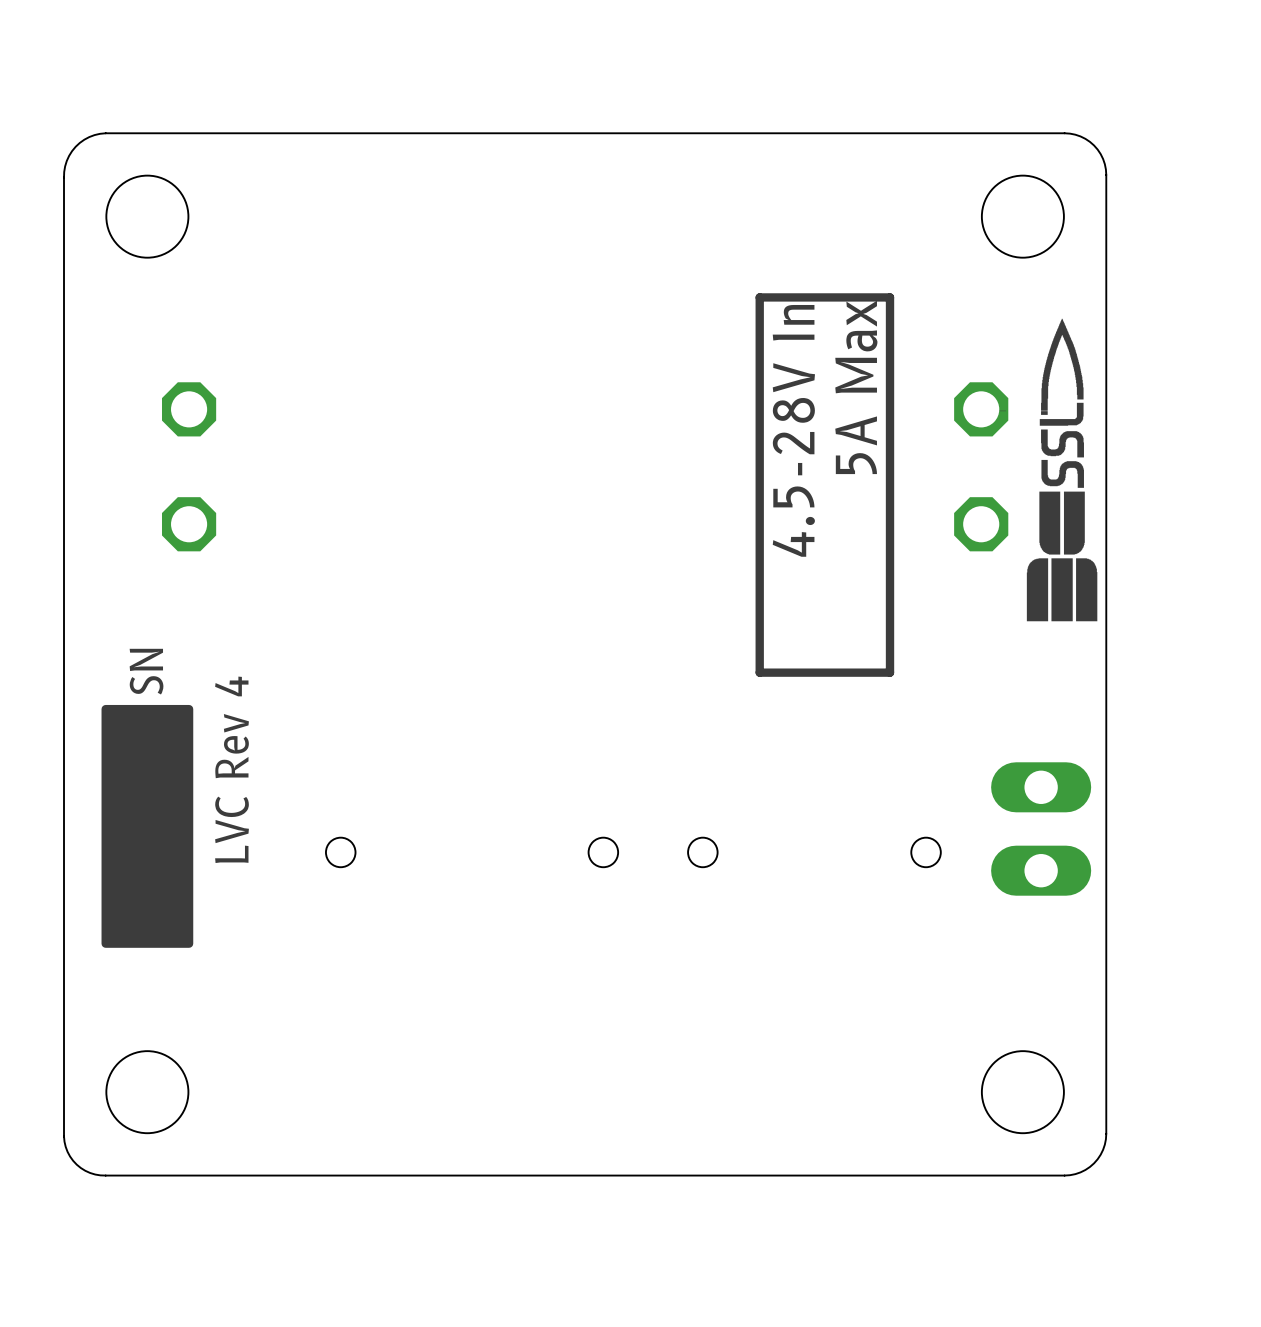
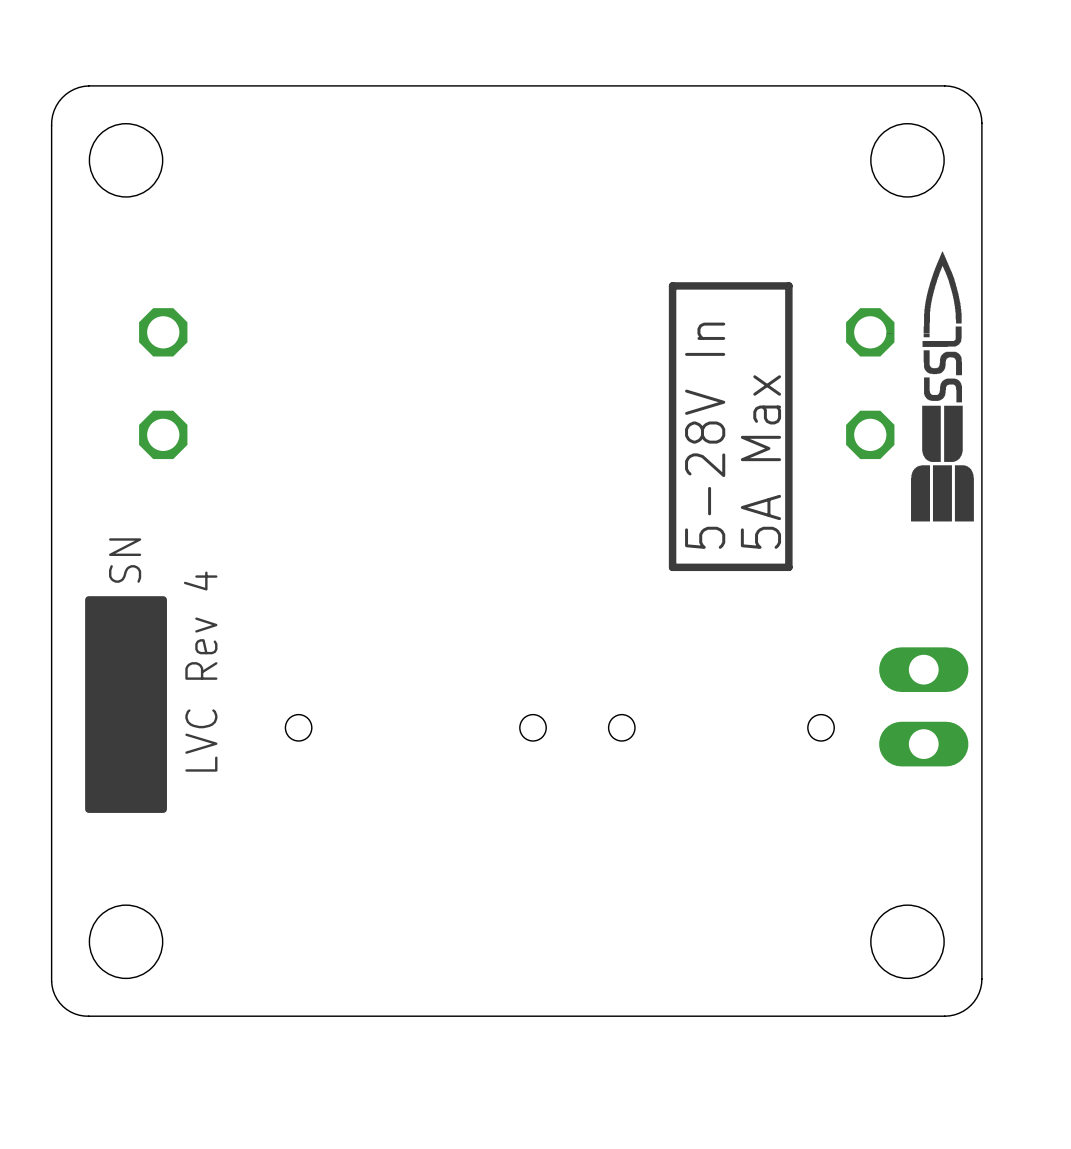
line: (890, 357) (890, 297) (759, 297) (759, 357) -> (788, 285) (672, 285)
text position: 5A Max (856, 387) -> 5A Max (760, 462)
text: 4.5-28V In (793, 430) -> 5-28V In (705, 435)

